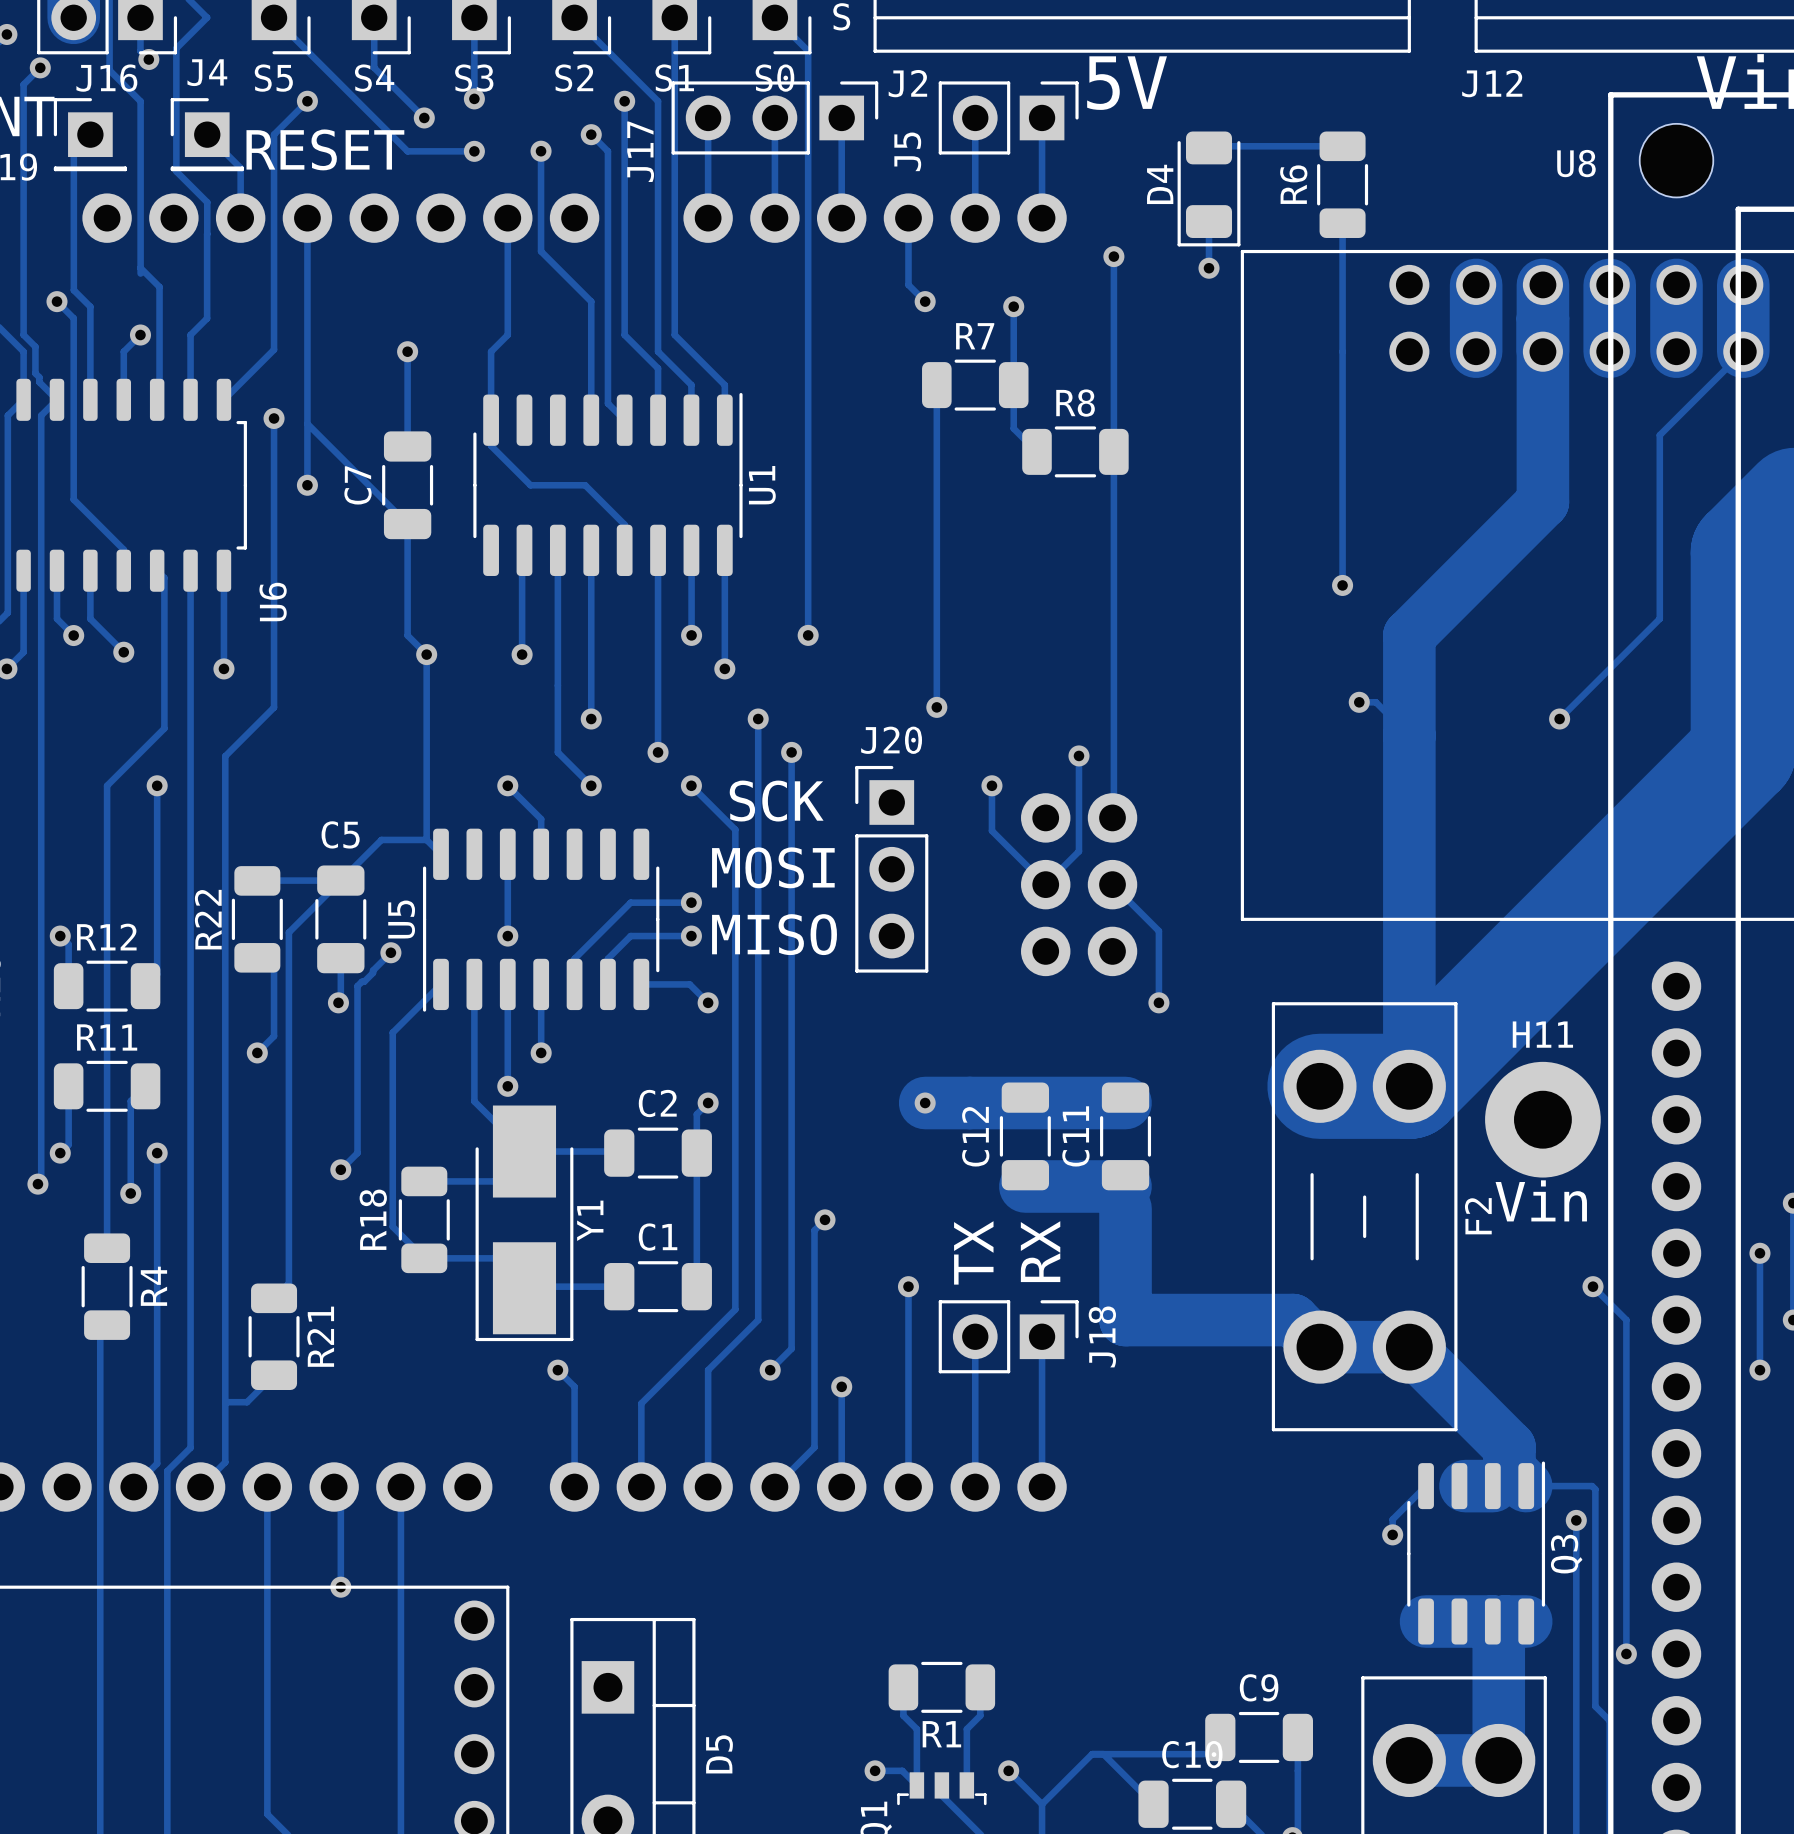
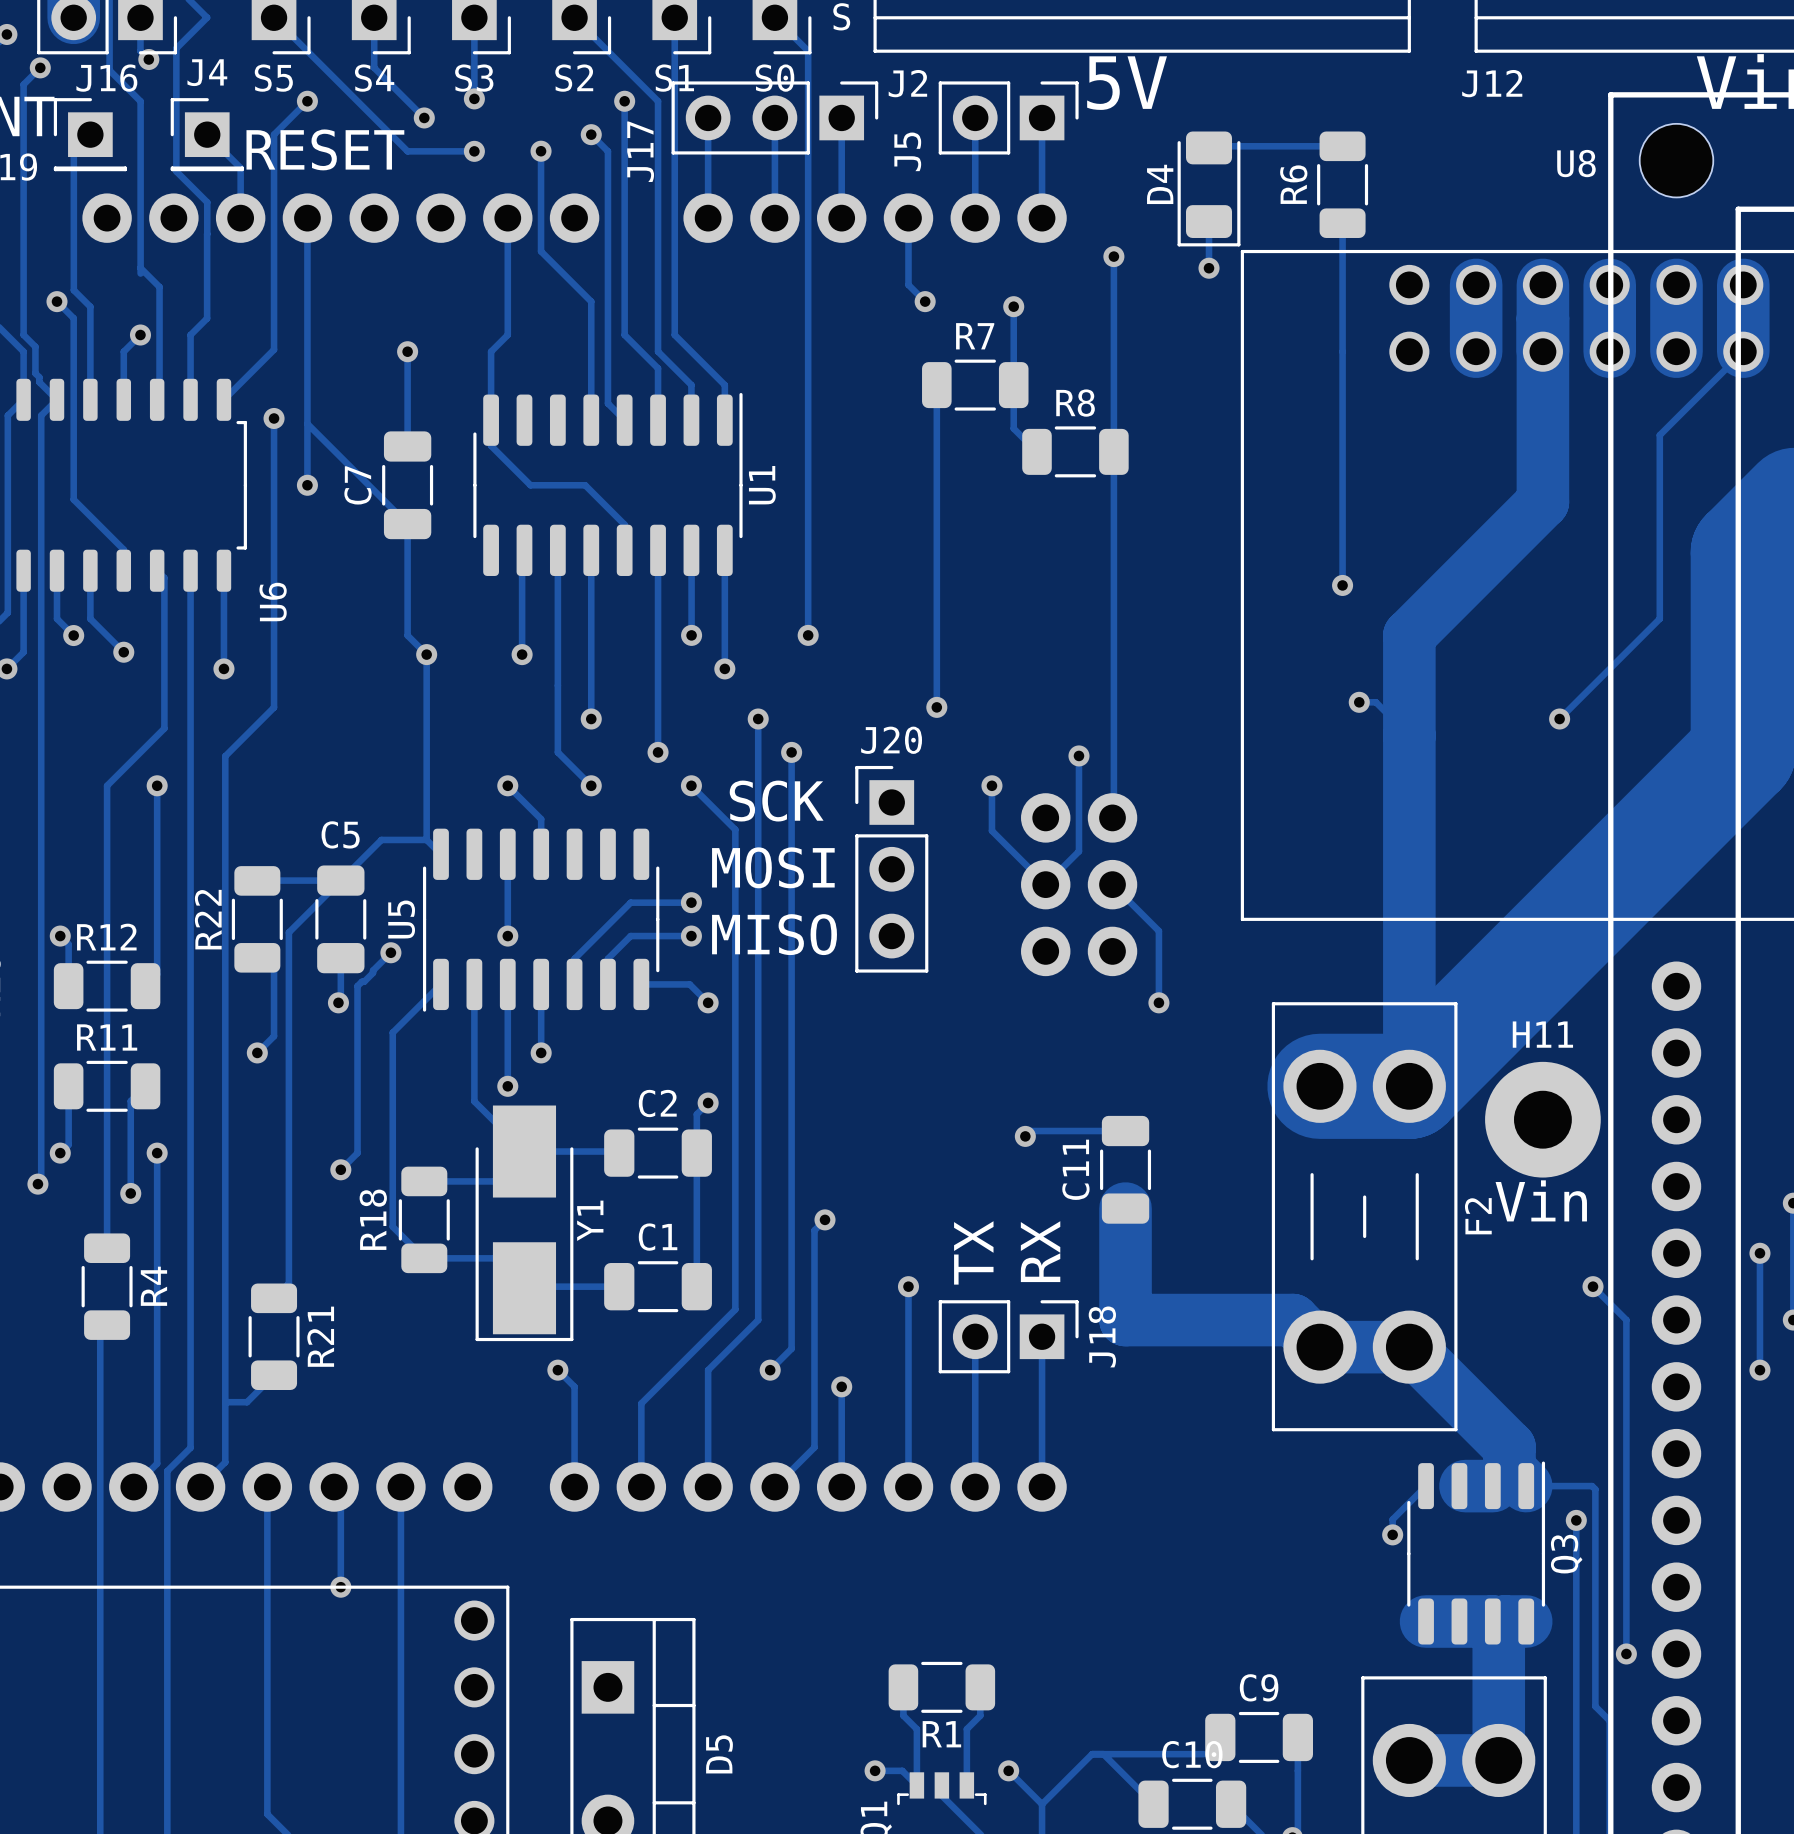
track: (925, 1103) (1125, 1103) -> none
via position: (925, 1103) -> (1025, 1136)
track: none -> (1125, 1131) (1030, 1131) (1025, 1136)
C12: (1025, 1136) -> none
C11 position: (1125, 1136) -> (1125, 1169)
track: (1025, 1186) (1125, 1186) -> none

